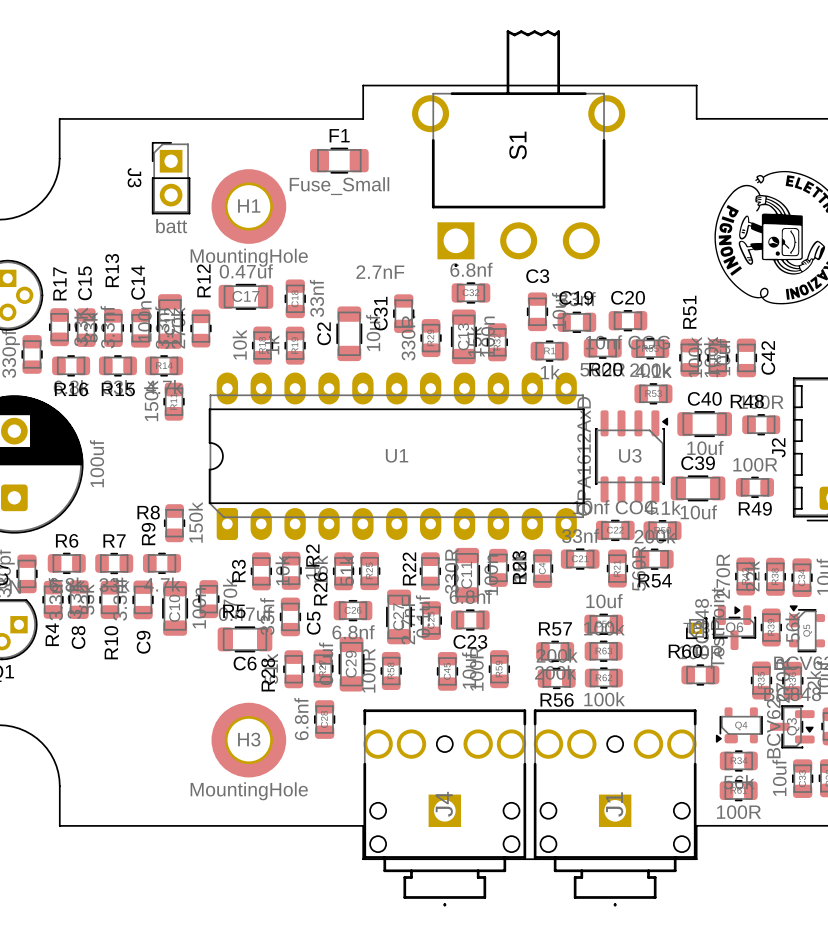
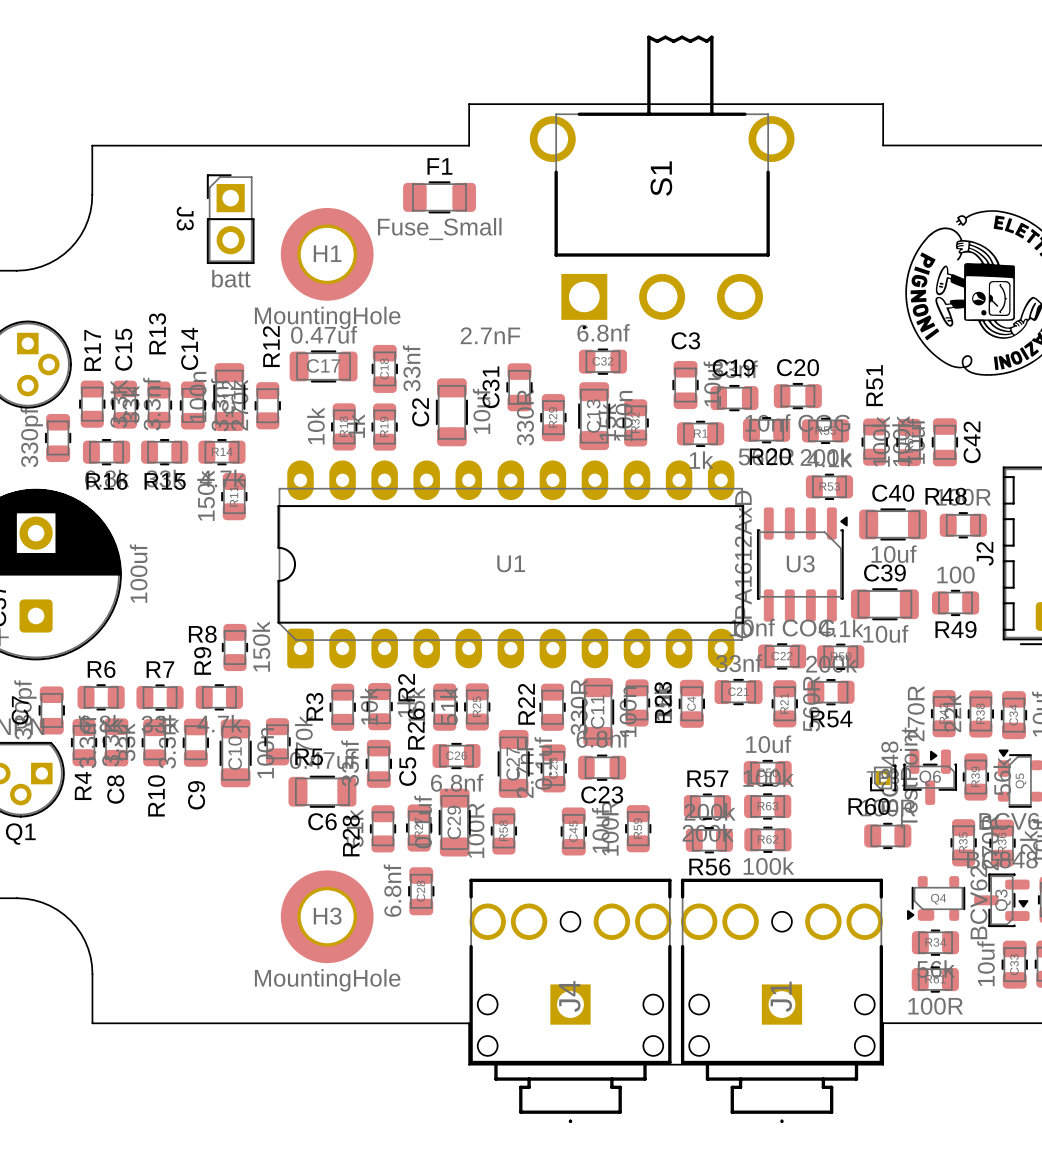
R49 value: 100R (755, 464) -> 100 (956, 574)

